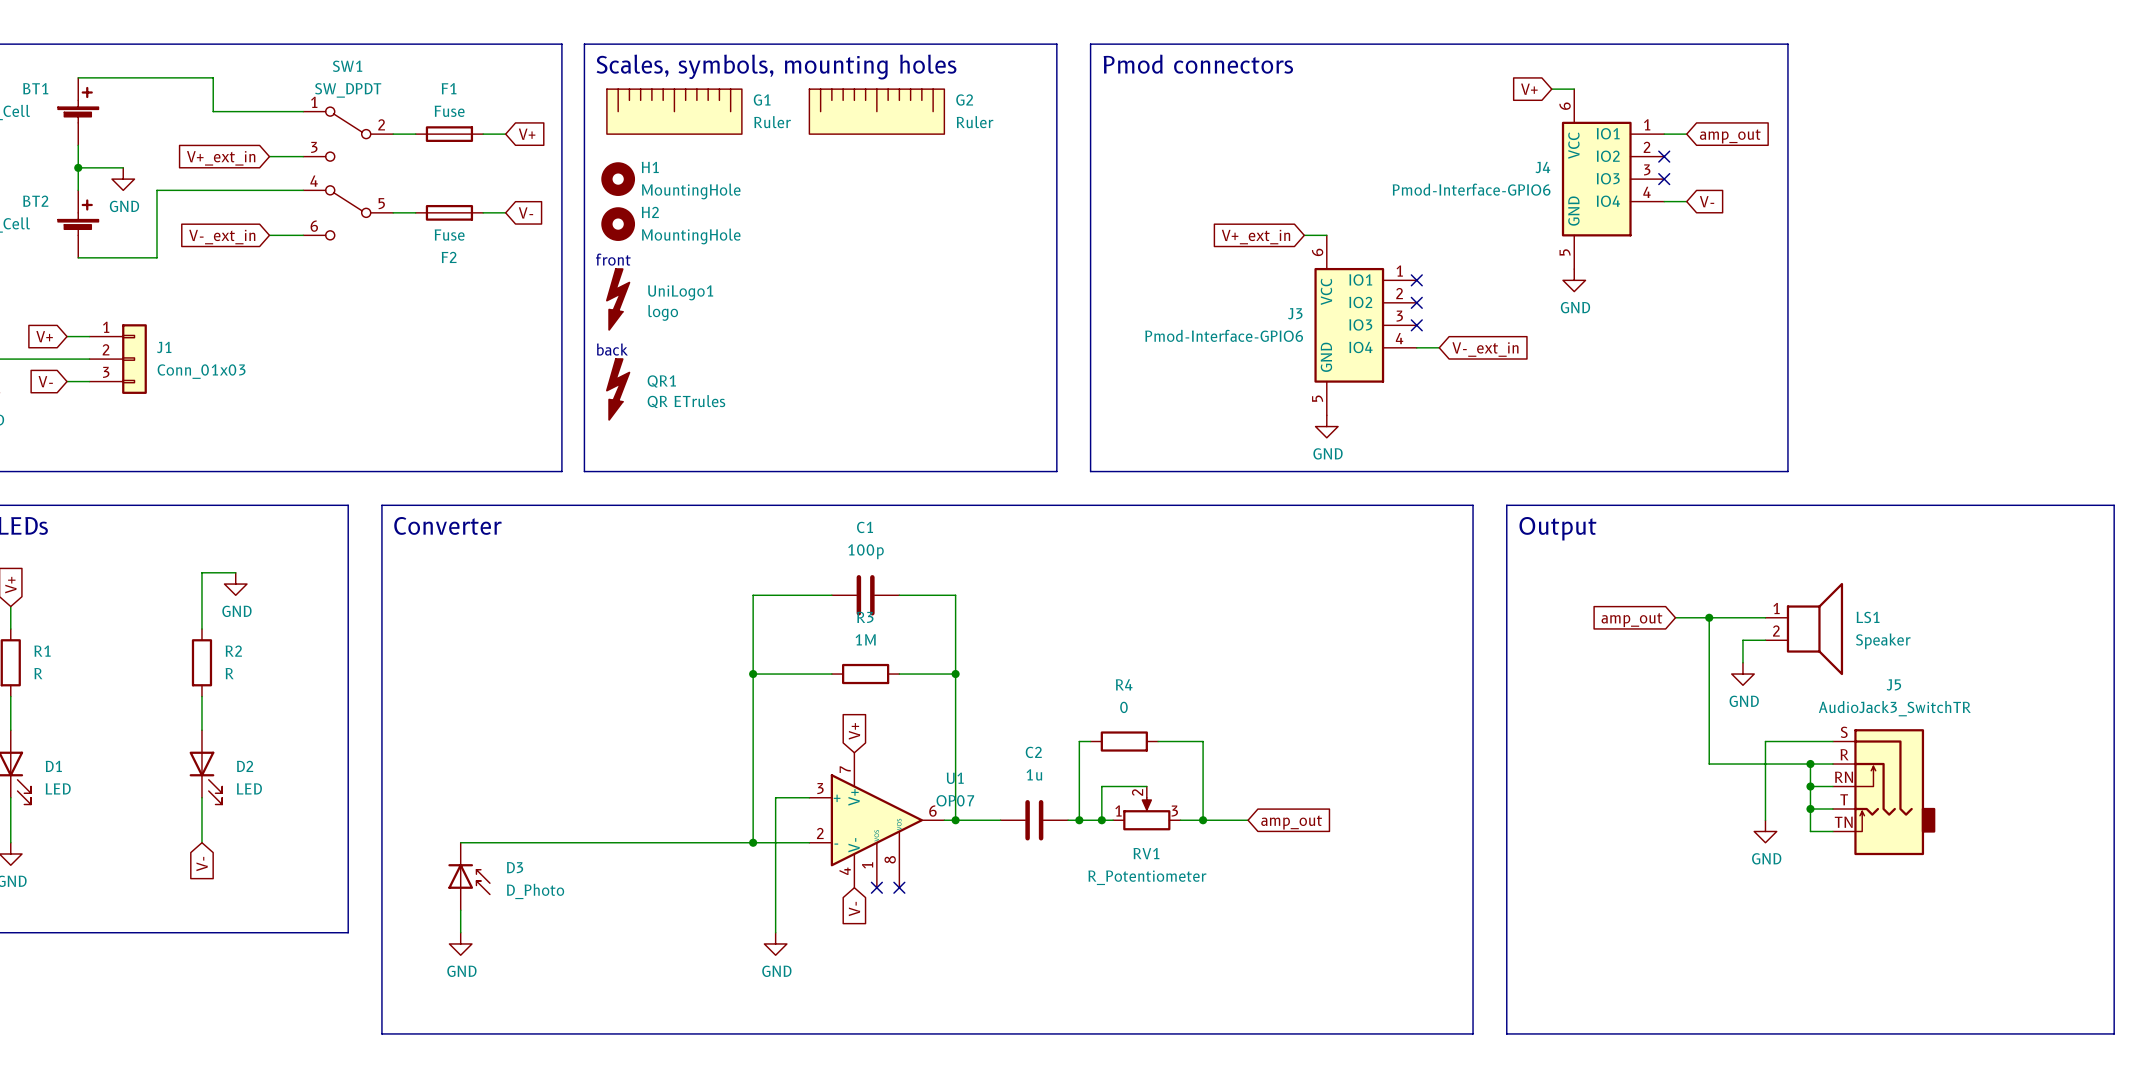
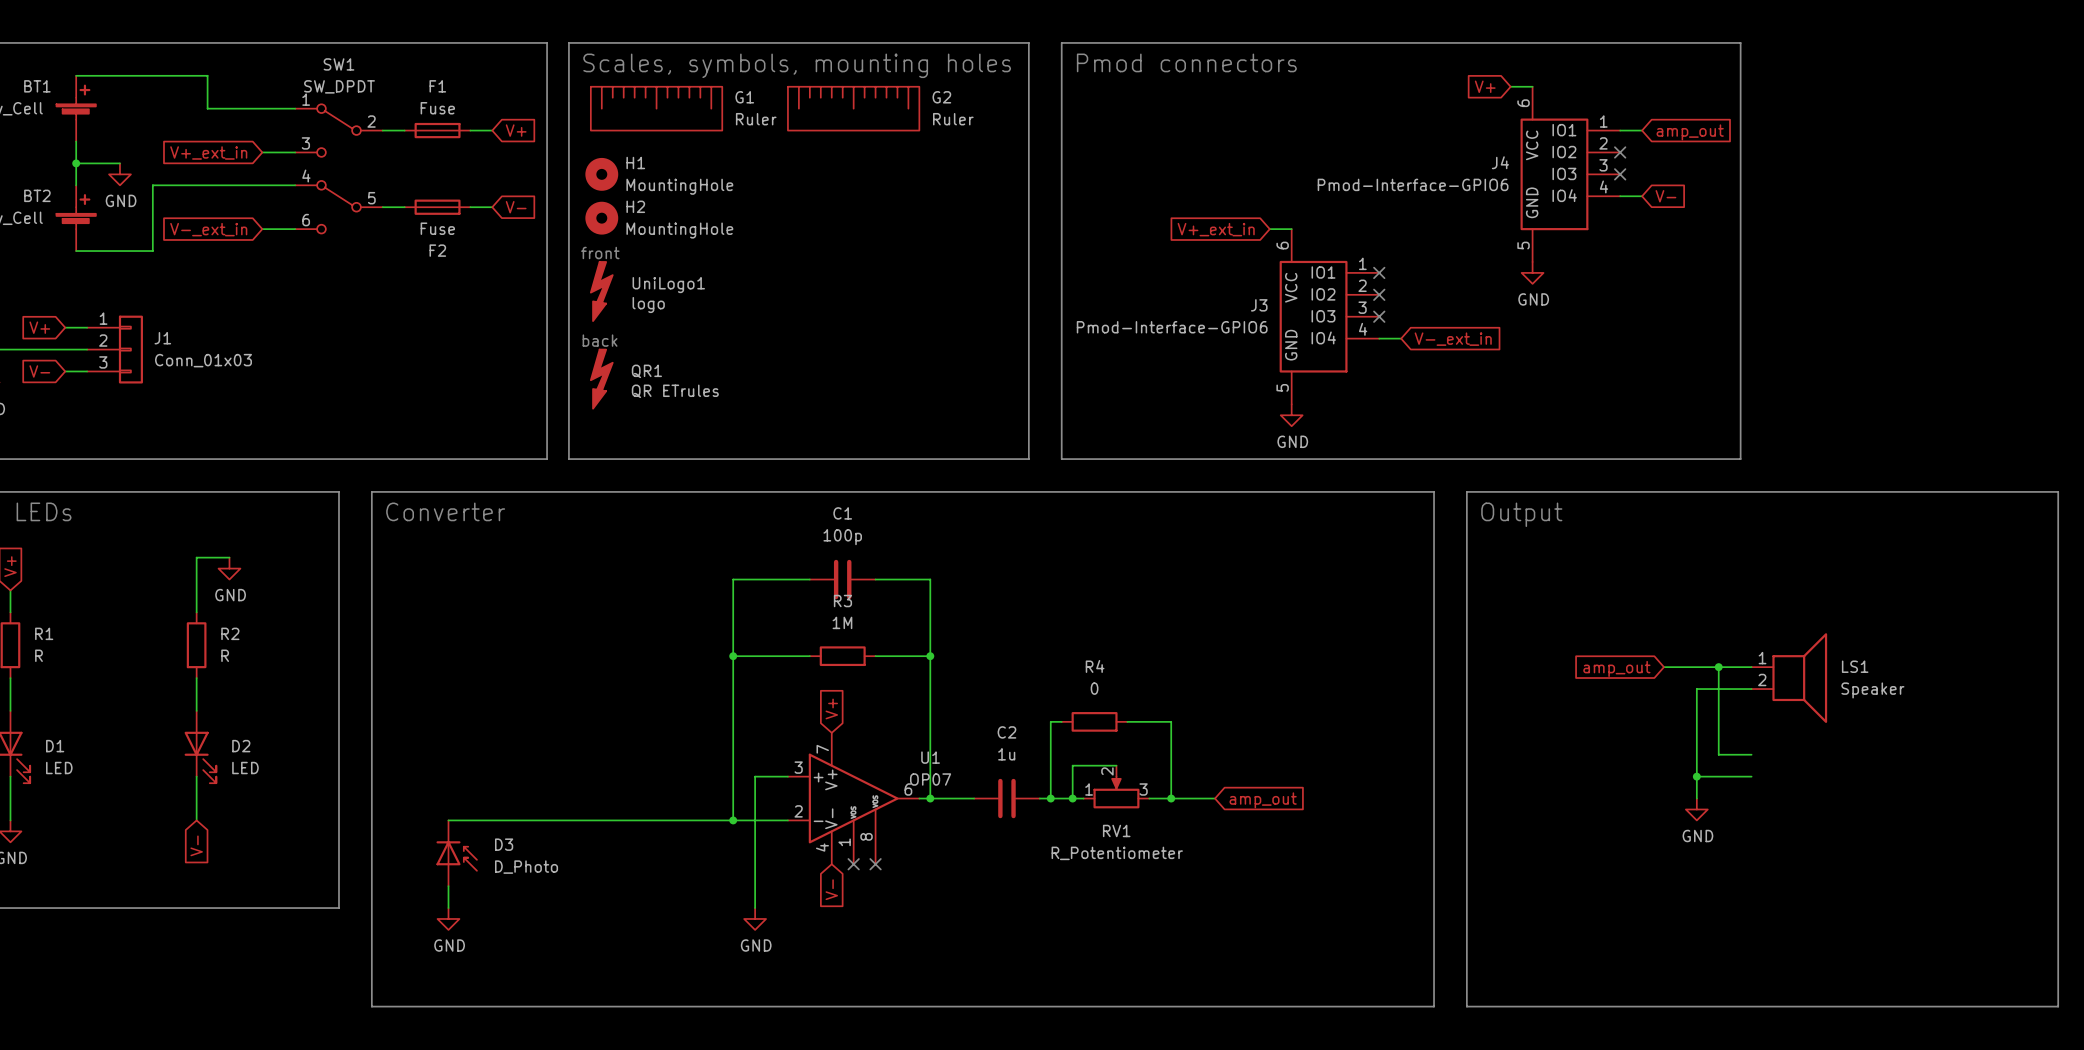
wire: (1675, 617) (1765, 617) -> (1663, 667) (1751, 667)
wire: (1709, 617) (1709, 764) (1832, 764) -> none
junction: (1709, 617) -> none
global label position: amp_out (1631, 620) -> amp_out (1616, 668)
LS1 position: (1804, 629) -> (1789, 678)
wire: (1765, 640) (1742, 640) (1742, 662) -> none
power symbol: GND (1742, 674) -> none
junction: none -> (1718, 667)
wire: none -> (1751, 689) (1696, 689) (1696, 798)
wire: (1765, 741) (1832, 741) -> (1718, 721) (1718, 667)
wire: (1810, 764) (1810, 831) (1832, 831) -> none
junction: (1810, 764) -> none
wire: (1765, 775) (1765, 820) -> (1718, 754) (1751, 754)
wire: (1810, 786) (1832, 786) -> none
junction: (1810, 786) -> none
J5: AudioJack3_SwitchTR (1884, 792) -> none
wire: none -> (1696, 776) (1751, 776)
junction: none -> (1696, 776)
wire: (1810, 809) (1832, 809) -> none
junction: (1810, 809) -> none
power symbol position: GND (1765, 831) -> GND (1696, 809)

